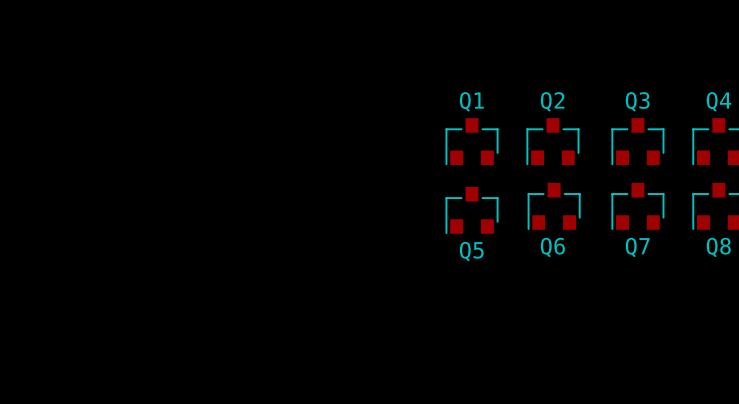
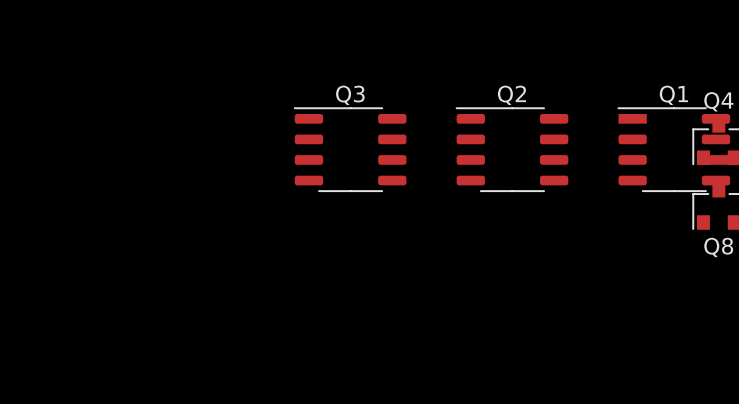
Q1 footprint: [445, 118, 499, 166] -> [617, 107, 731, 193]
Q2 footprint: [526, 118, 580, 166] -> [455, 107, 569, 193]
Q3 footprint: [611, 118, 665, 166] -> [293, 107, 407, 193]
Q6: (554, 206) -> none
Q7: (637, 206) -> none
Q5: (472, 210) -> none

